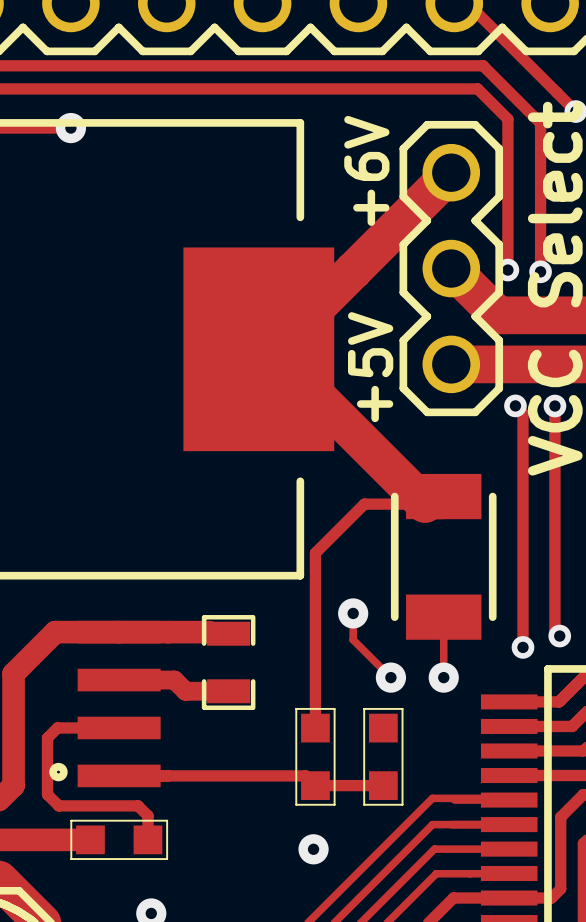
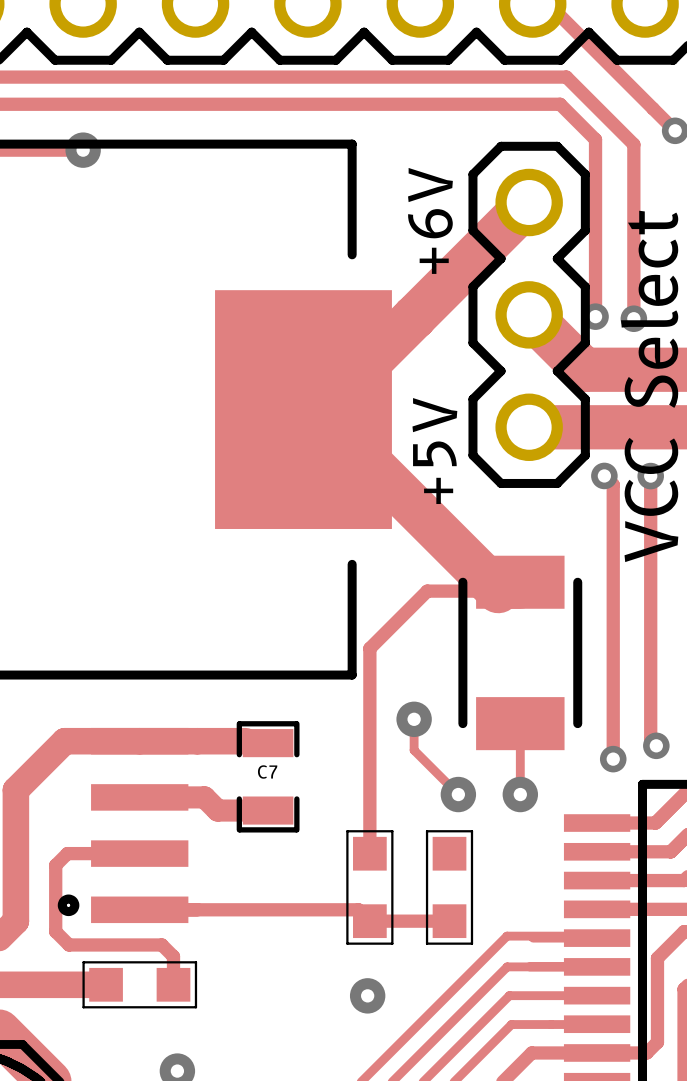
C7 name: none -> C7 (267, 772)

